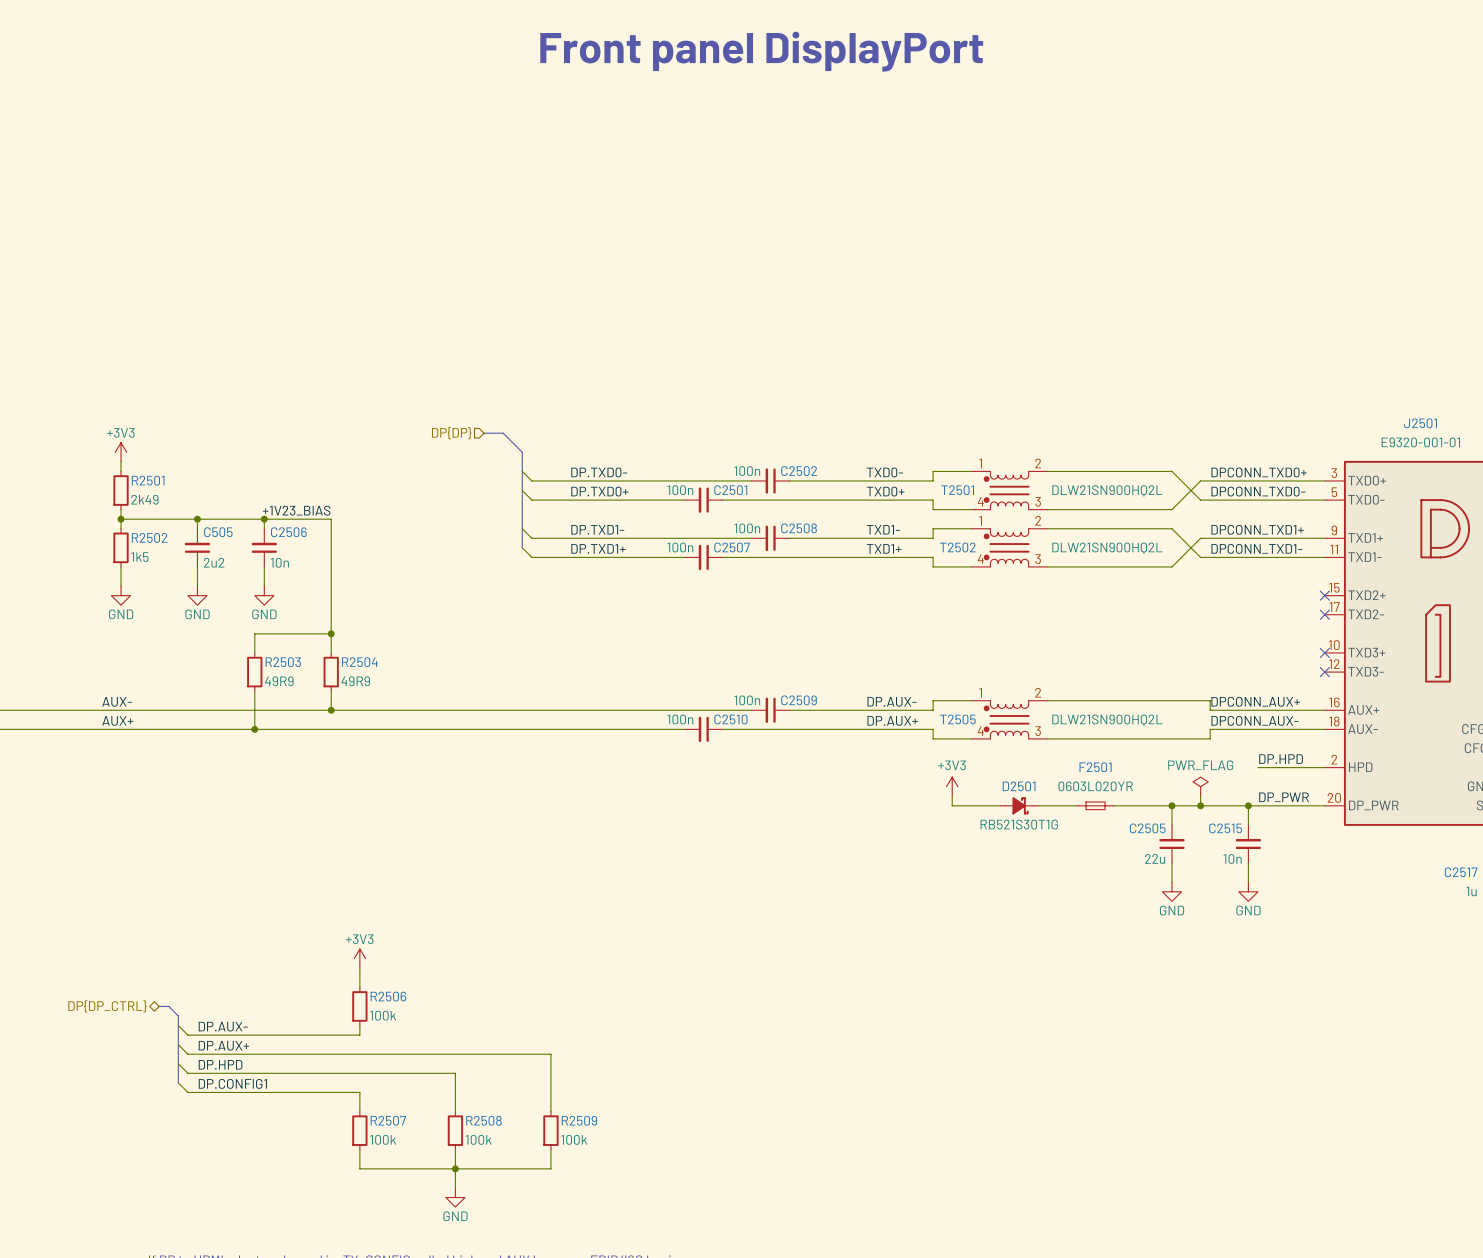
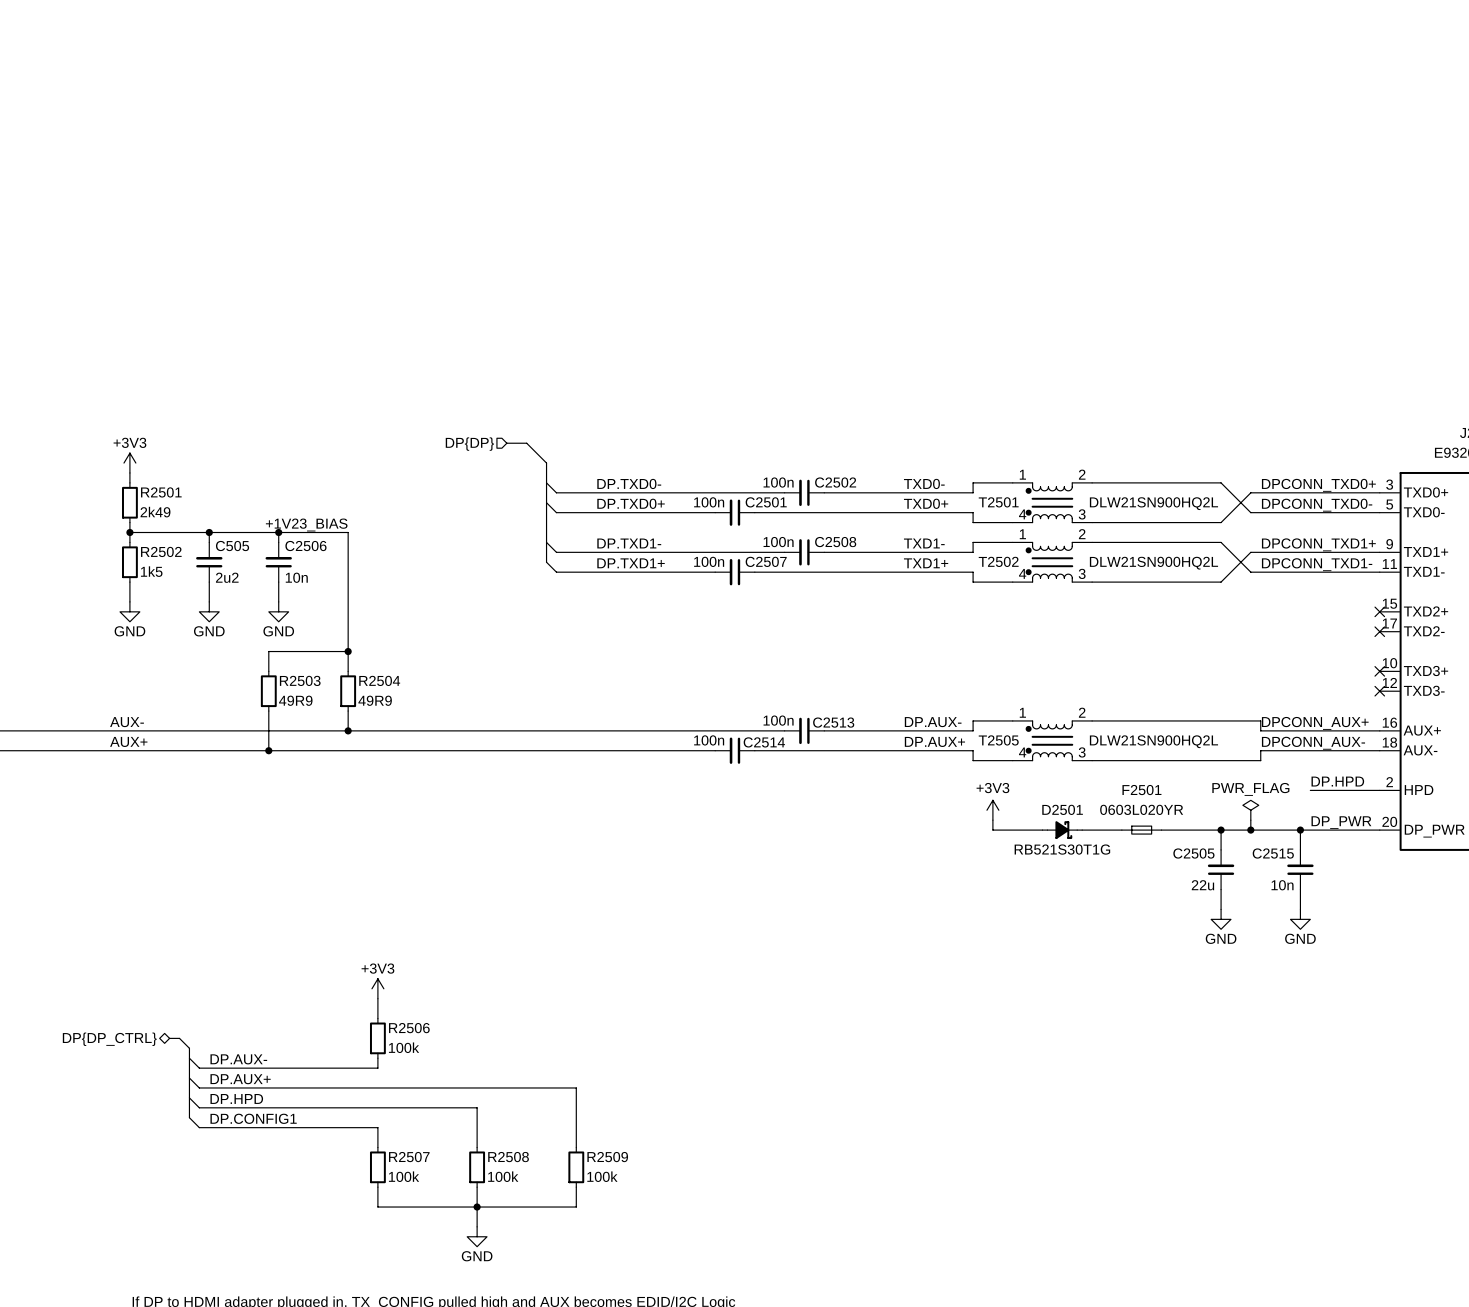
text: Front panel DisplayPort (761, 51) -> none
C2509 name: C2509 (799, 700) -> C2513 (833, 722)
C2510 name: C2510 (730, 719) -> C2514 (764, 742)

